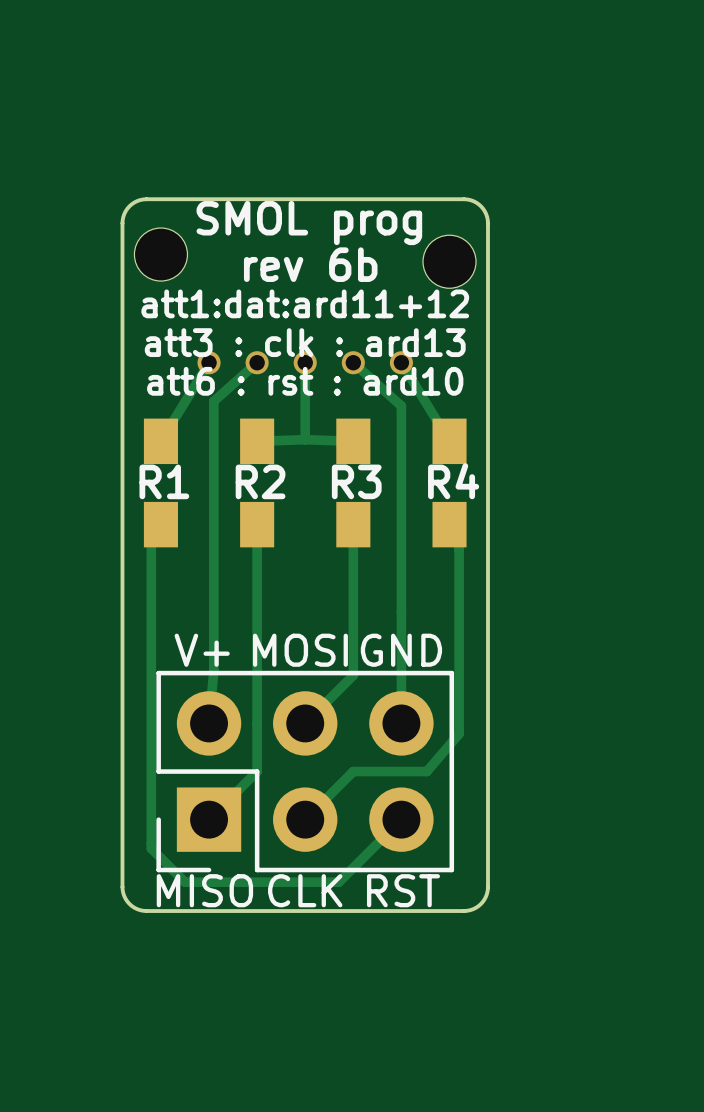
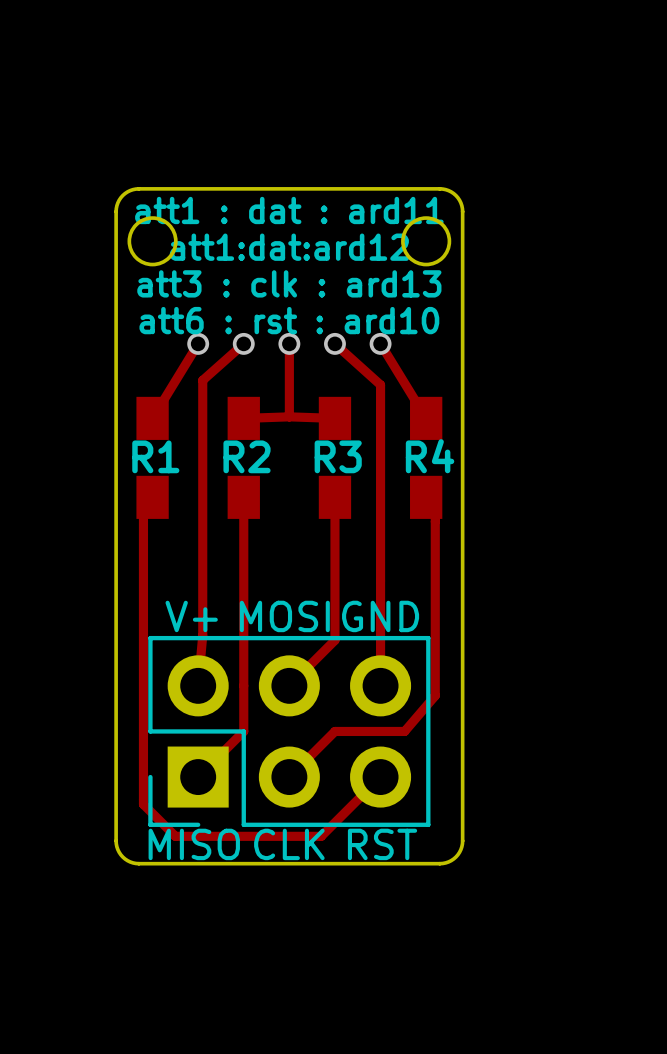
text: SMOL prog (309, 223) -> att1 : dat : ard11 (289, 210)
round board edge: none -> [127, 216, 178, 267]
round board edge: none -> [401, 216, 452, 267]
part: (160, 254) -> none
part: (449, 261) -> none
text: rev 6b (310, 264) -> att1:dat:ard12 (289, 247)
text: att1:dat:ard11+12 (305, 303) -> none
text position: att3 : clk : ard13 (305, 342) -> att3 : clk : ard13 (289, 283)
text position: att6 : rst : ard10 (305, 381) -> att6 : rst : ard10 (289, 320)

